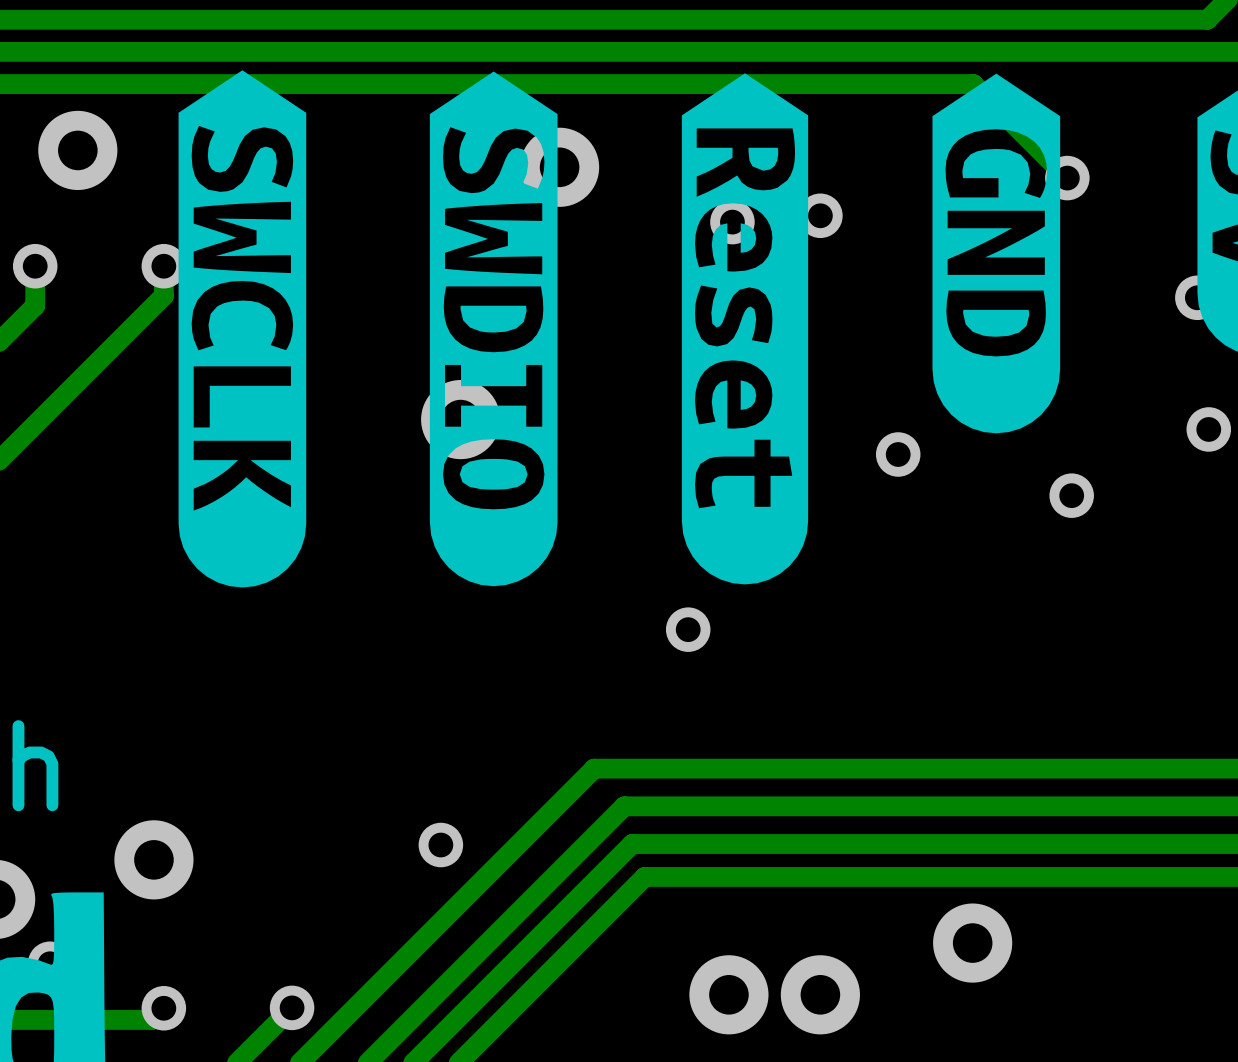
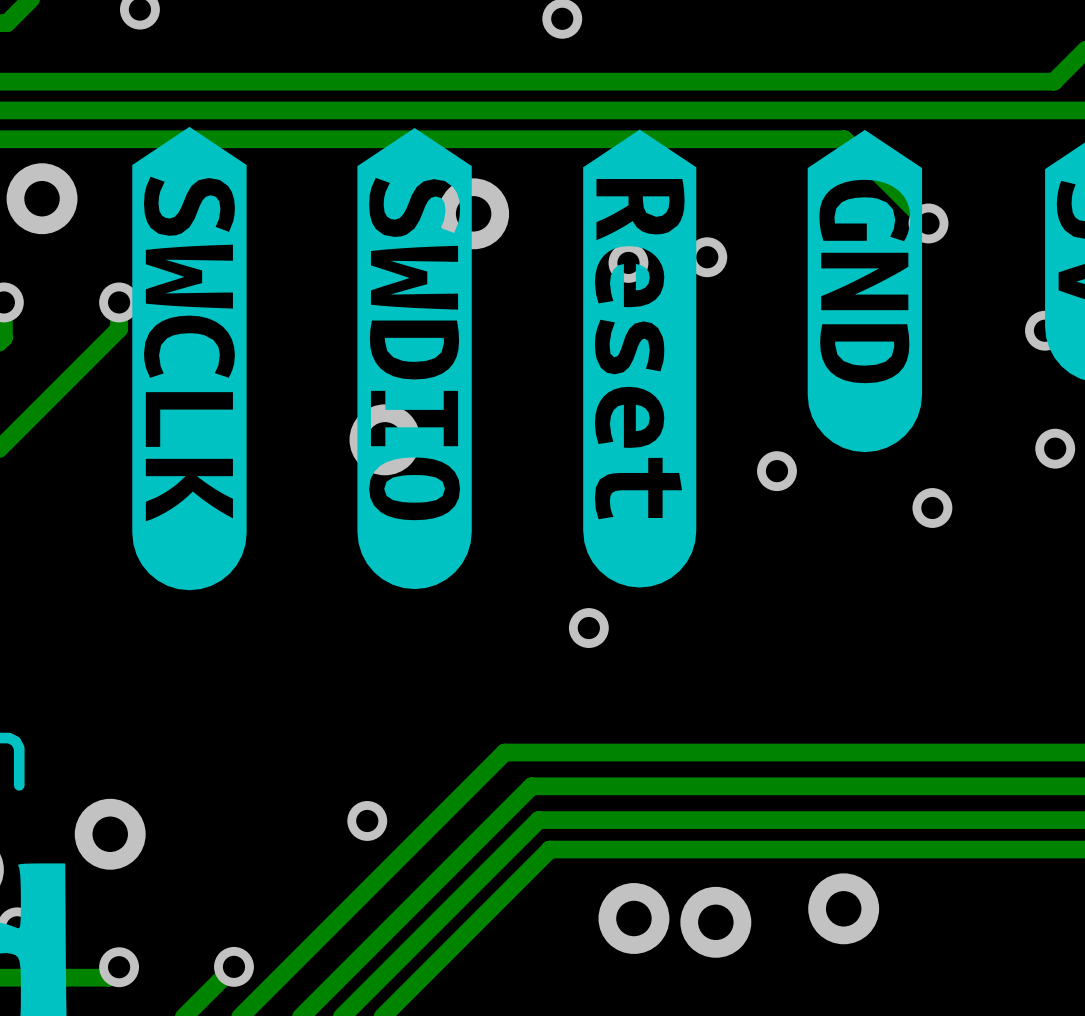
via position: (728, 994) -> (633, 918)
via position: (820, 994) -> (715, 922)

